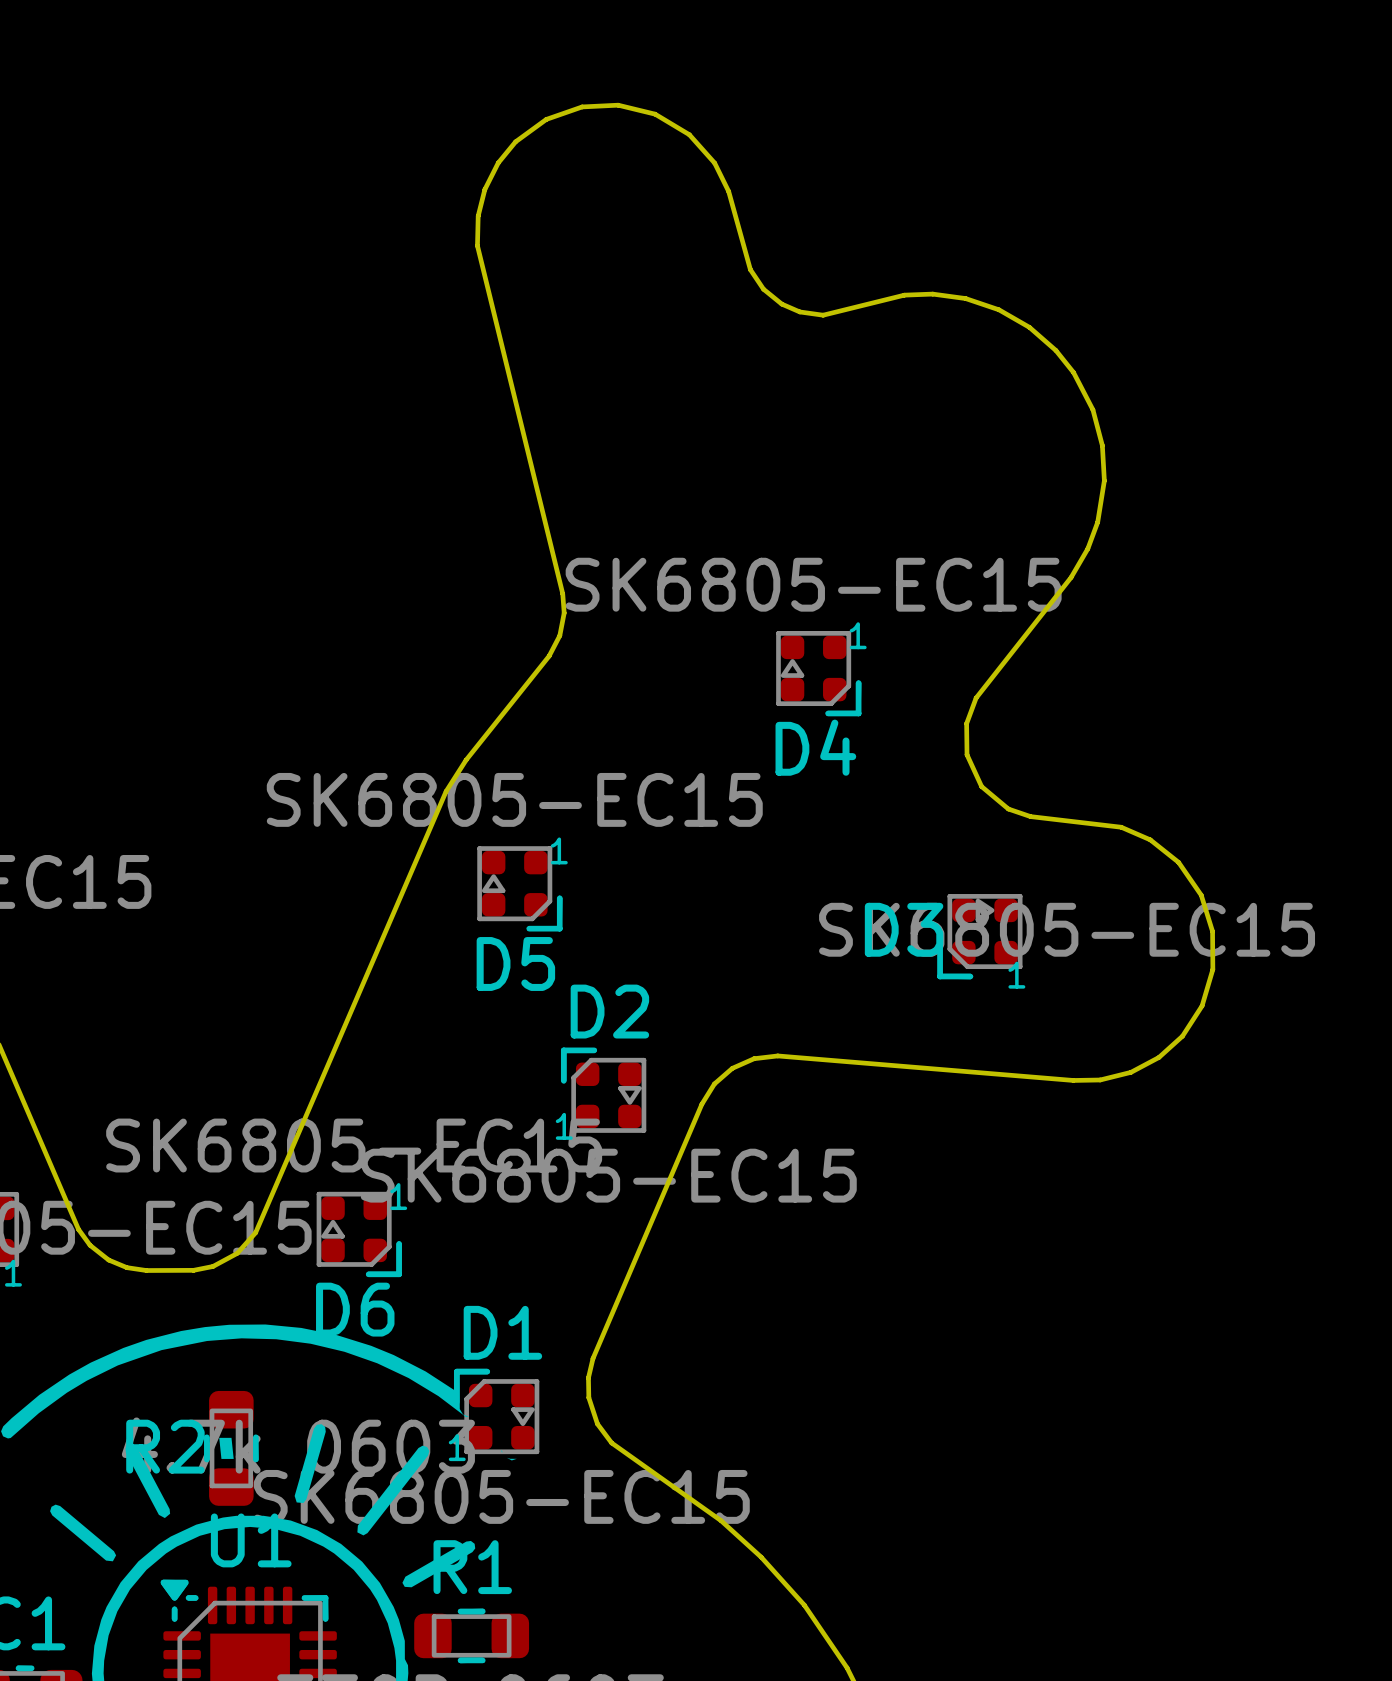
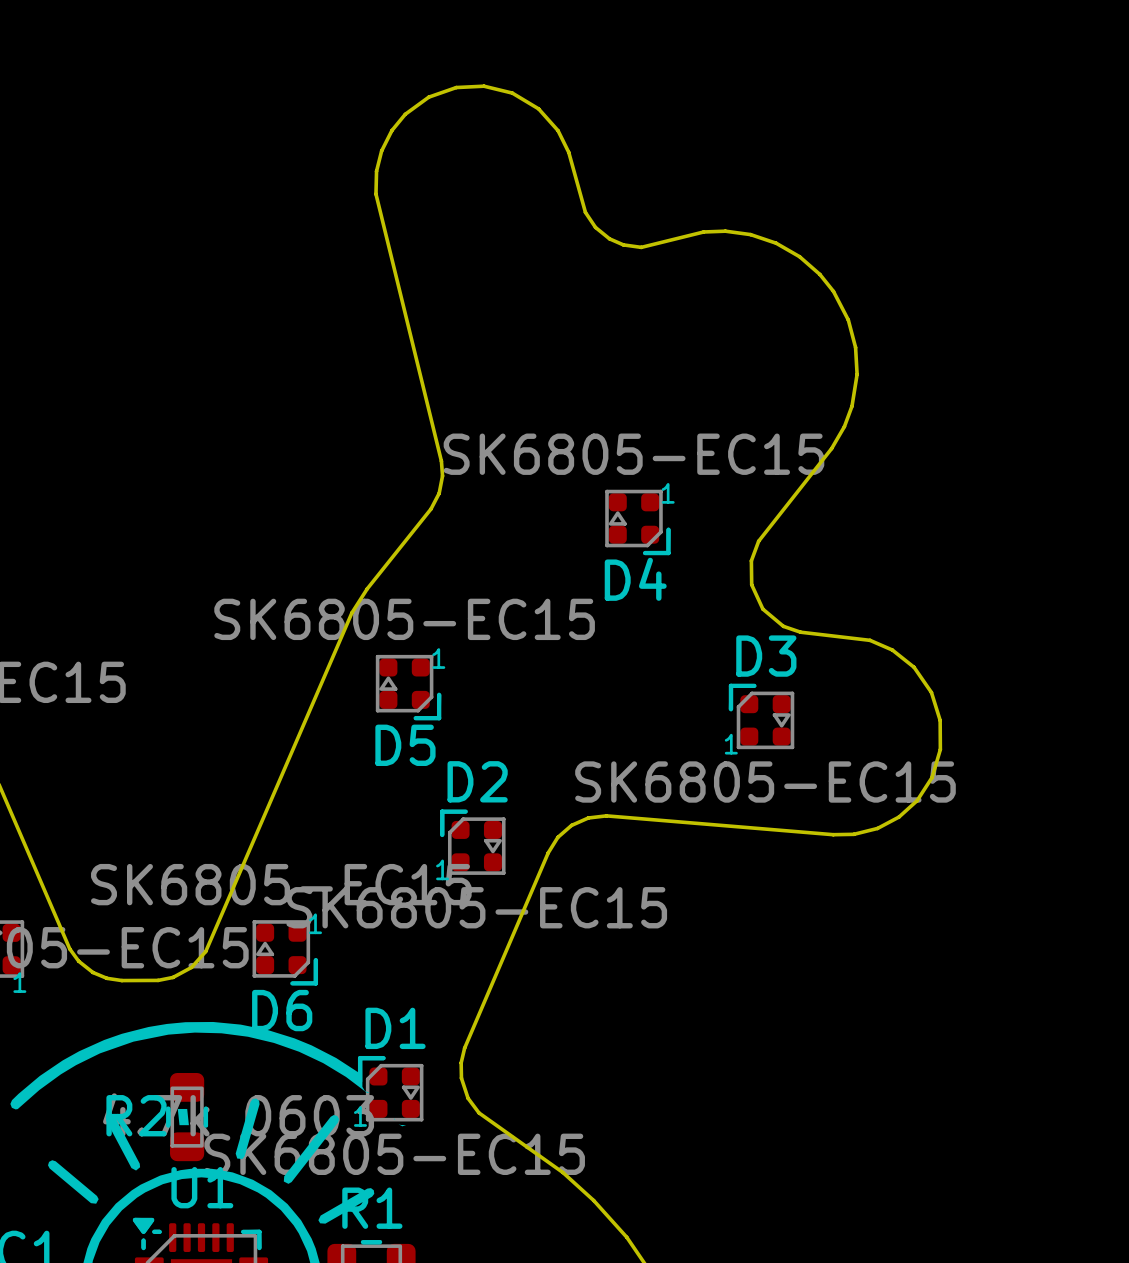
D3 rotation: 0° (979, 936) -> 90° clockwise (761, 716)

